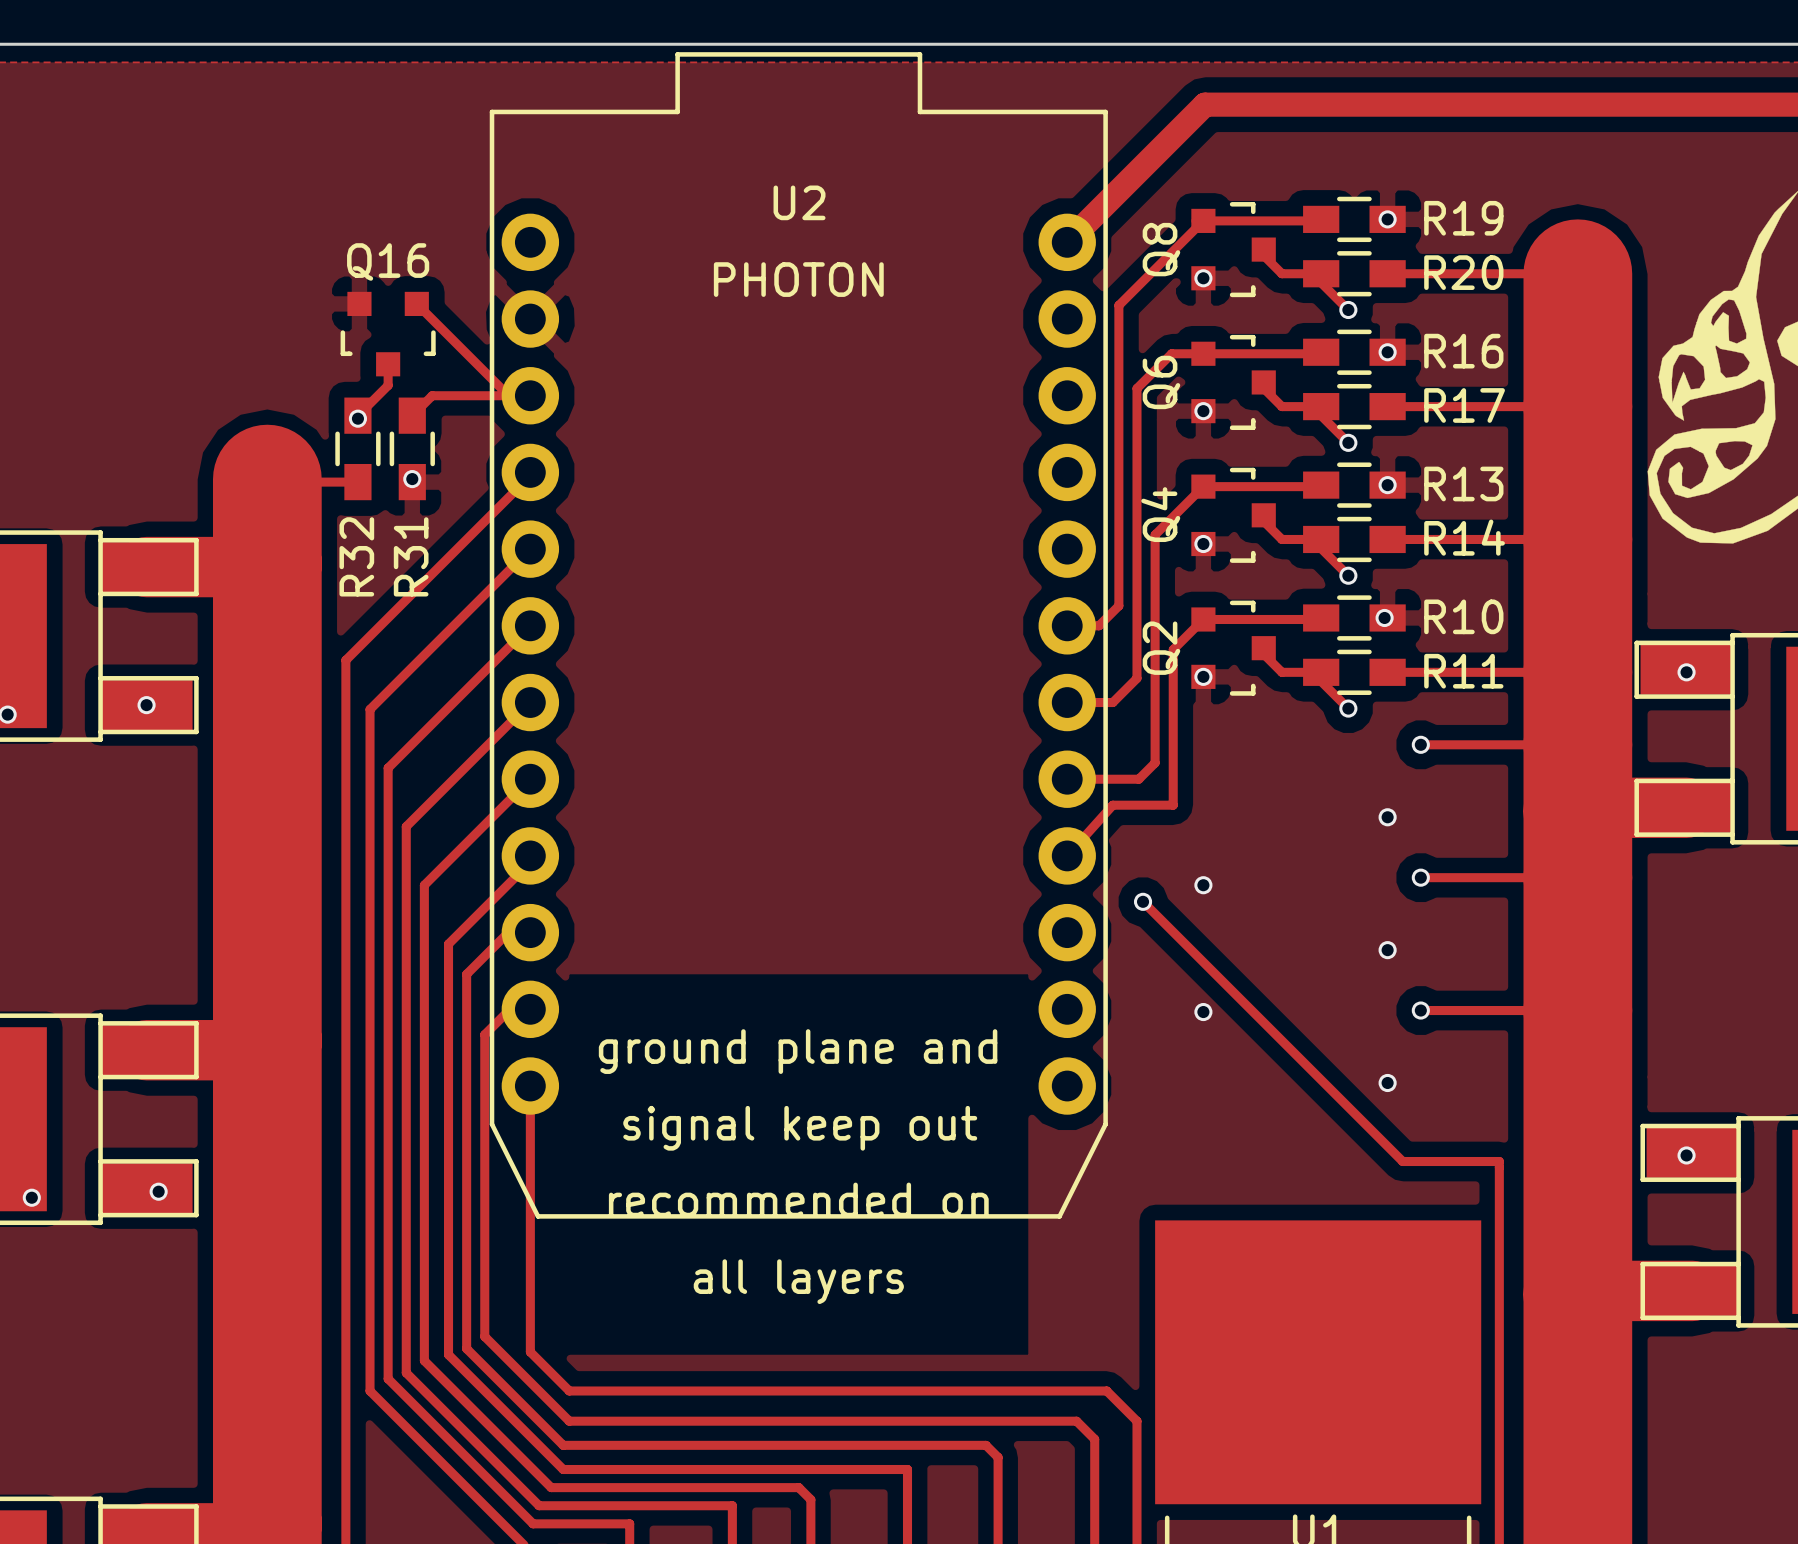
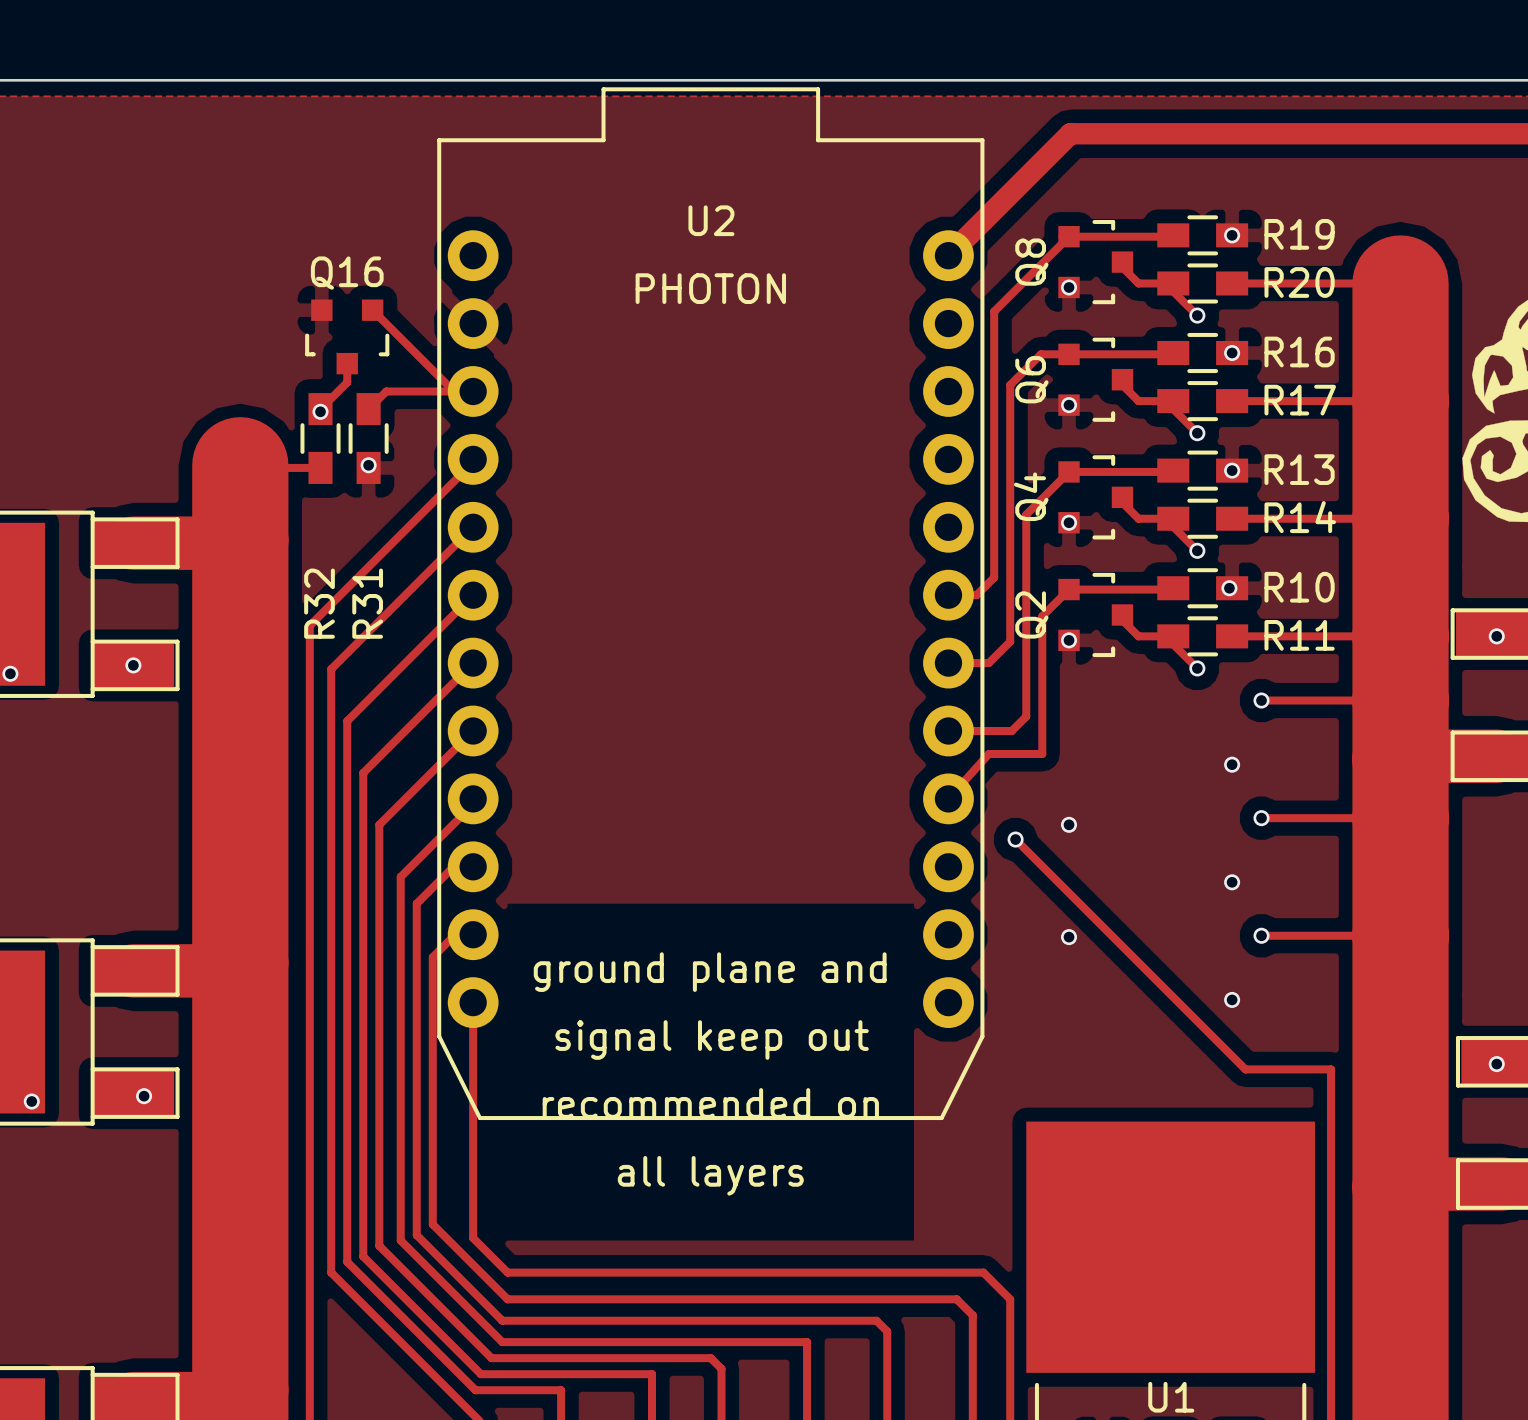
R32 name position: R32 (356, 556) -> R32 (319, 603)
R31 name position: R31 (411, 556) -> R31 (367, 603)

